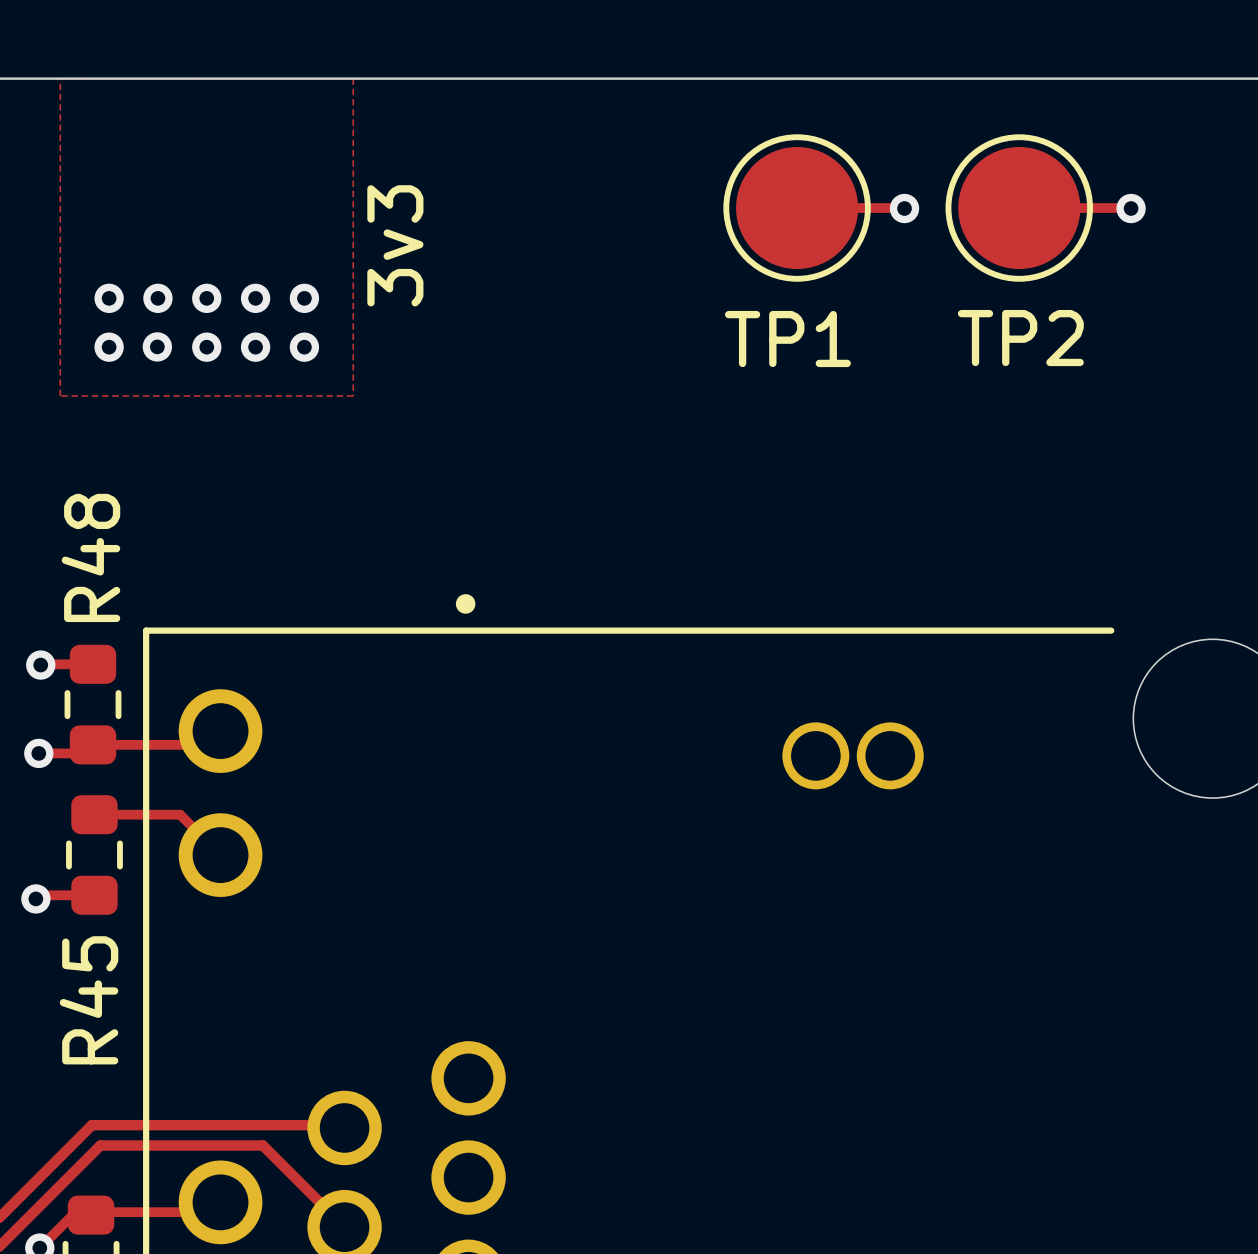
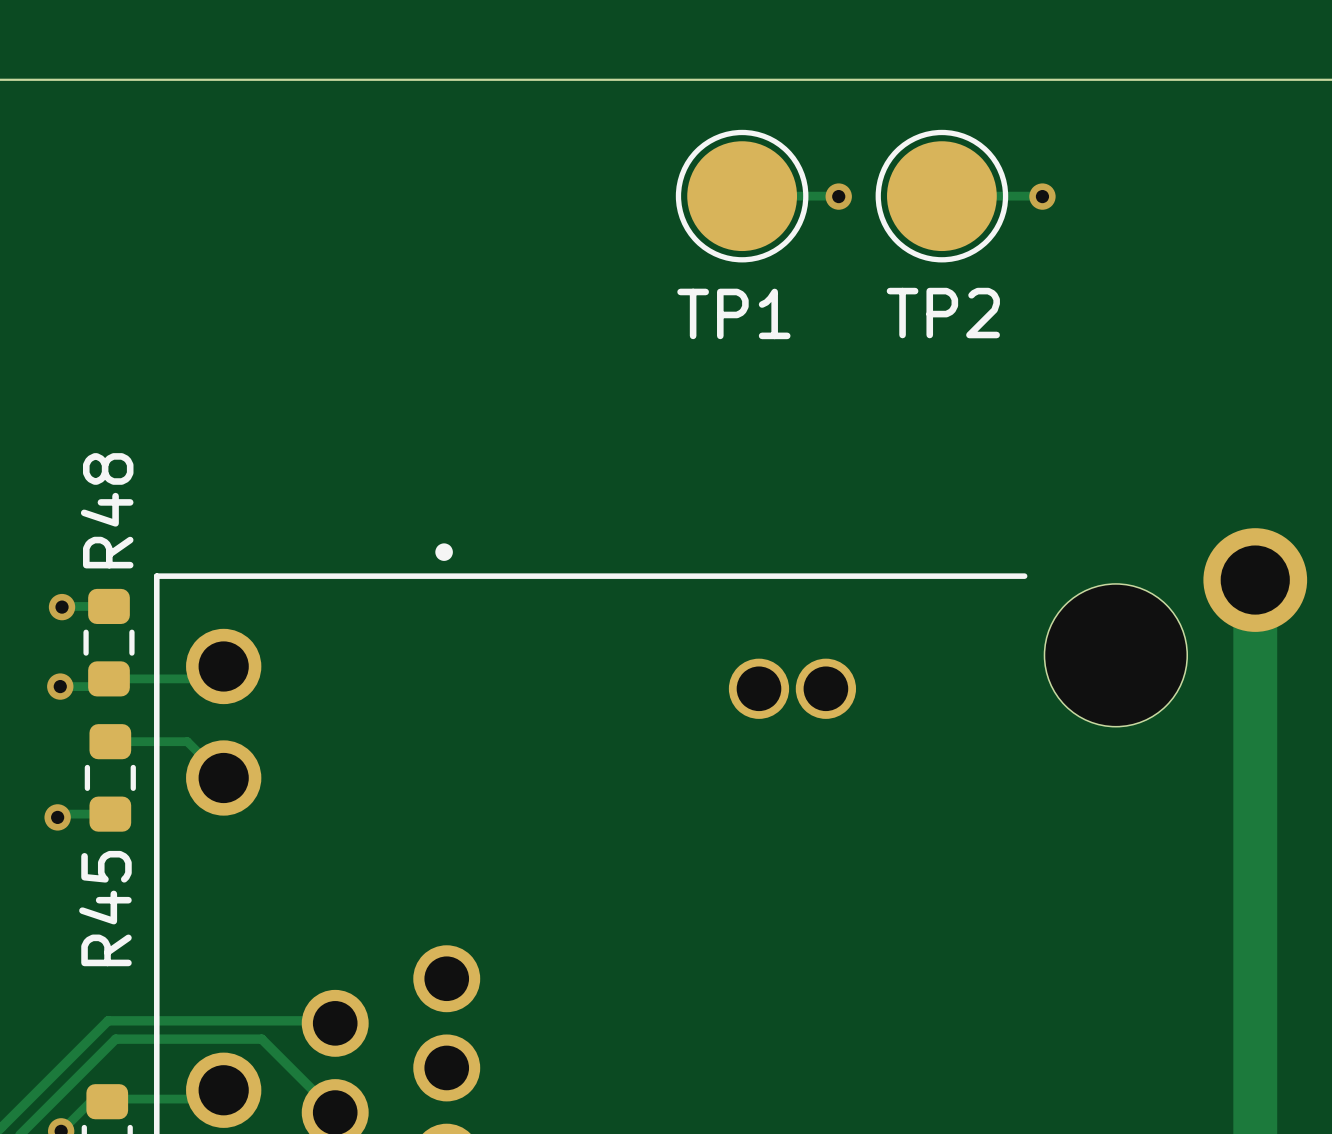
zone outline: (60, 78) (60, 396) (353, 396) (353, 78) (60, 78) -> none
text: 3v3 (395, 245) -> none
via: (109, 298) -> none
via: (157, 298) -> none
via: (206, 298) -> none
via: (255, 298) -> none
via: (304, 298) -> none
via: (157, 346) -> none
via: (109, 347) -> none
via: (206, 347) -> none
via: (255, 347) -> none
via: (304, 347) -> none

